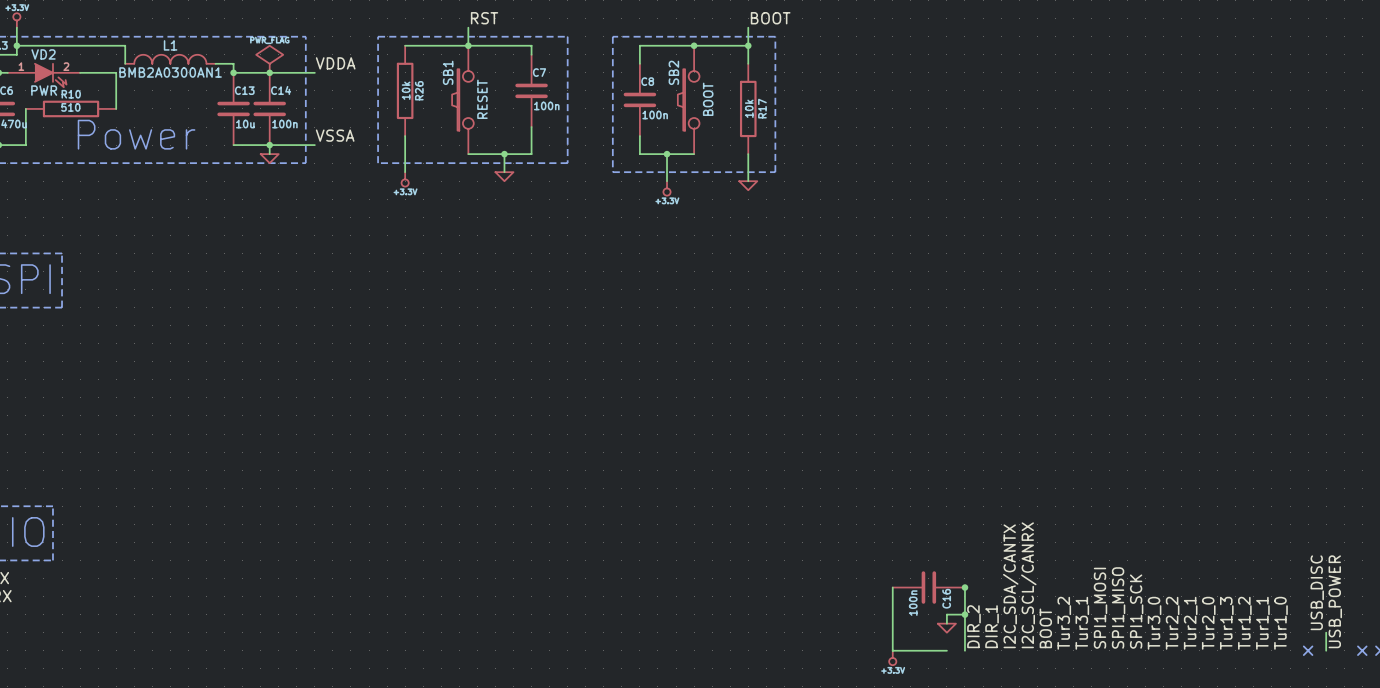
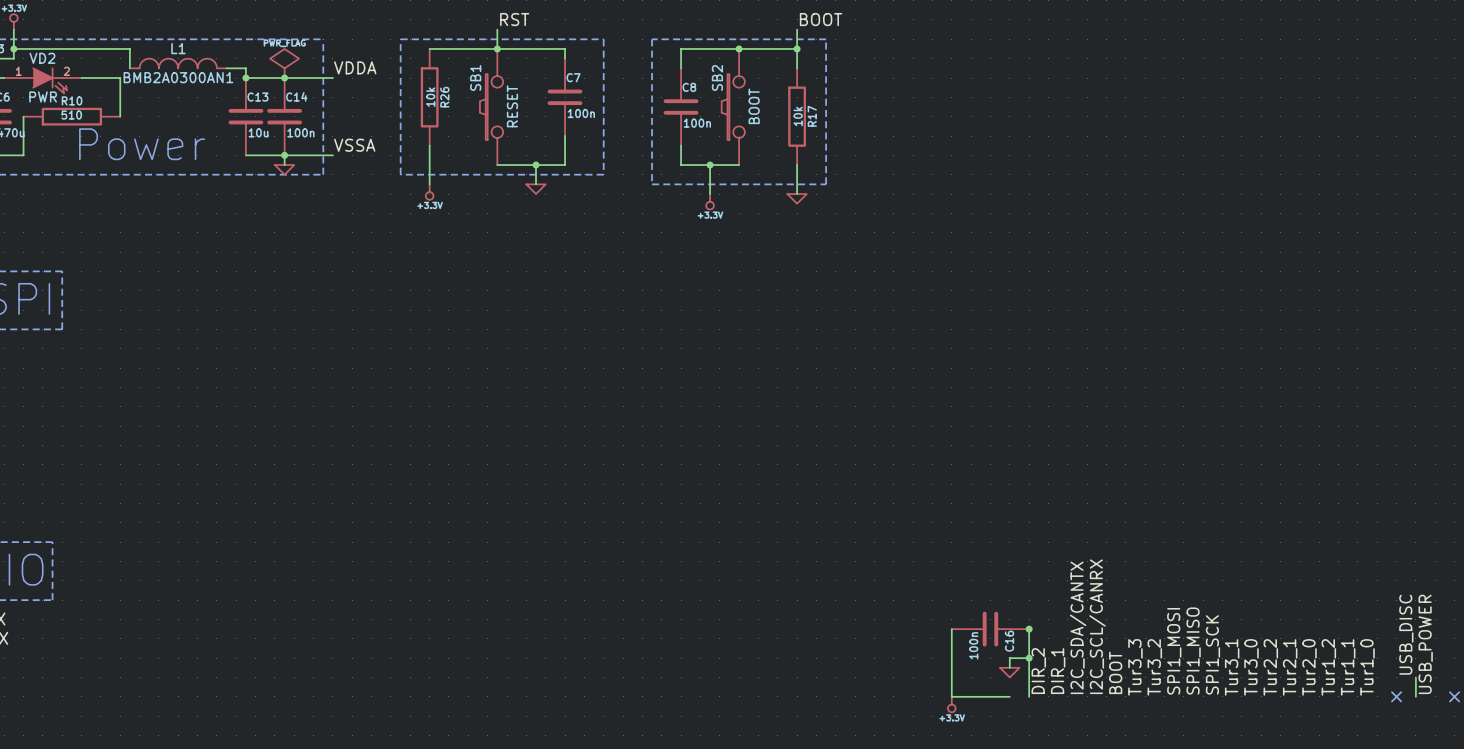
label: Tur3_2 (1064, 623) -> Tur3_3 (1135, 667)
label: Tur3_1 (1082, 623) -> Tur3_2 (1154, 667)
label: Tur3_0 (1154, 623) -> Tur3_1 (1232, 667)
label: Tur2_2 (1172, 623) -> Tur3_0 (1251, 667)
label: Tur2_1 (1190, 623) -> Tur2_2 (1270, 667)
label: Tur2_0 (1208, 623) -> Tur2_1 (1290, 667)
label: Tur1_3 (1226, 623) -> Tur2_0 (1309, 667)

